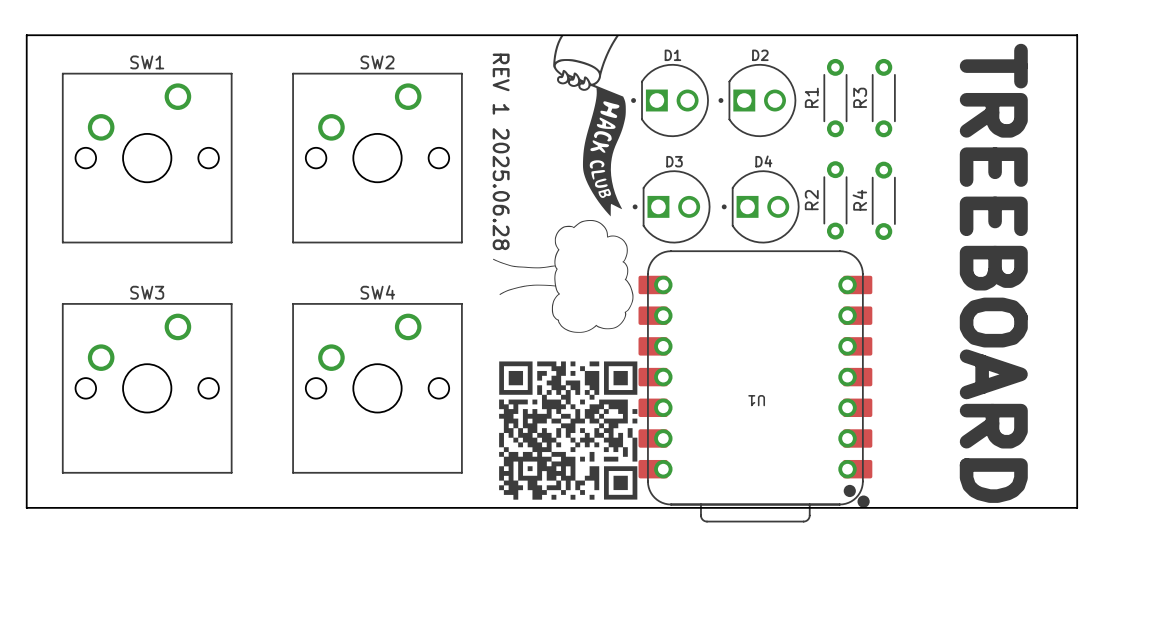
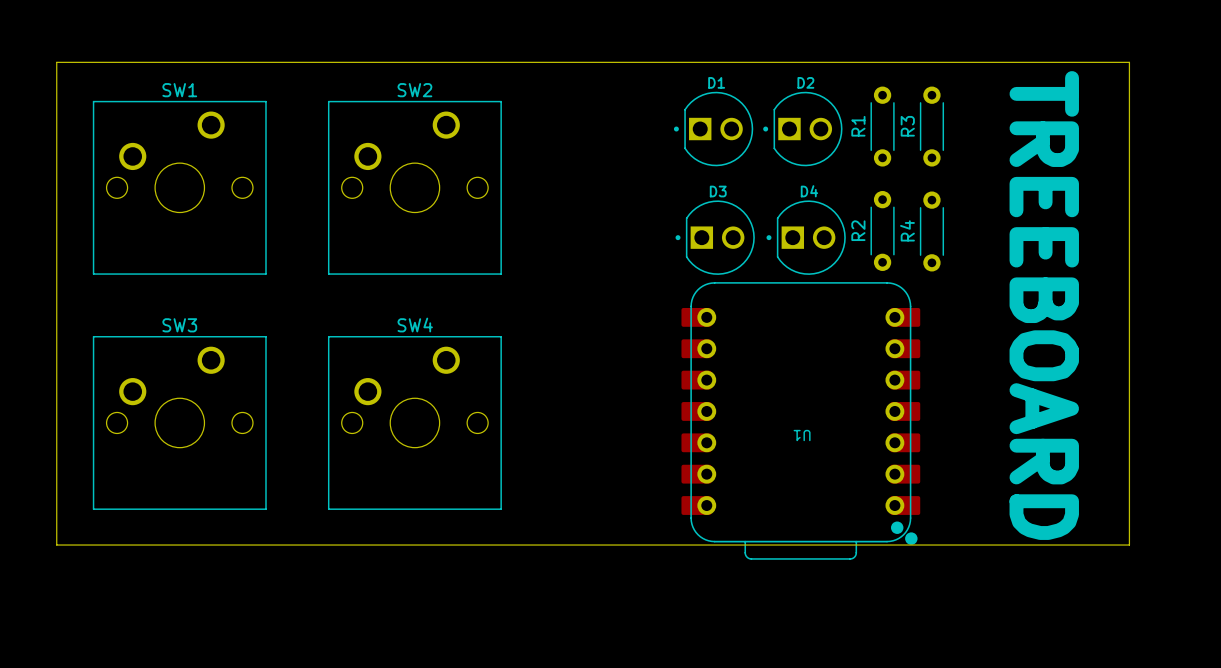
drawing: [493, 35, 634, 333] -> none
text: REV 1 2025.06.28 (501, 151) -> none
drawing: [499, 361, 638, 500] -> none

